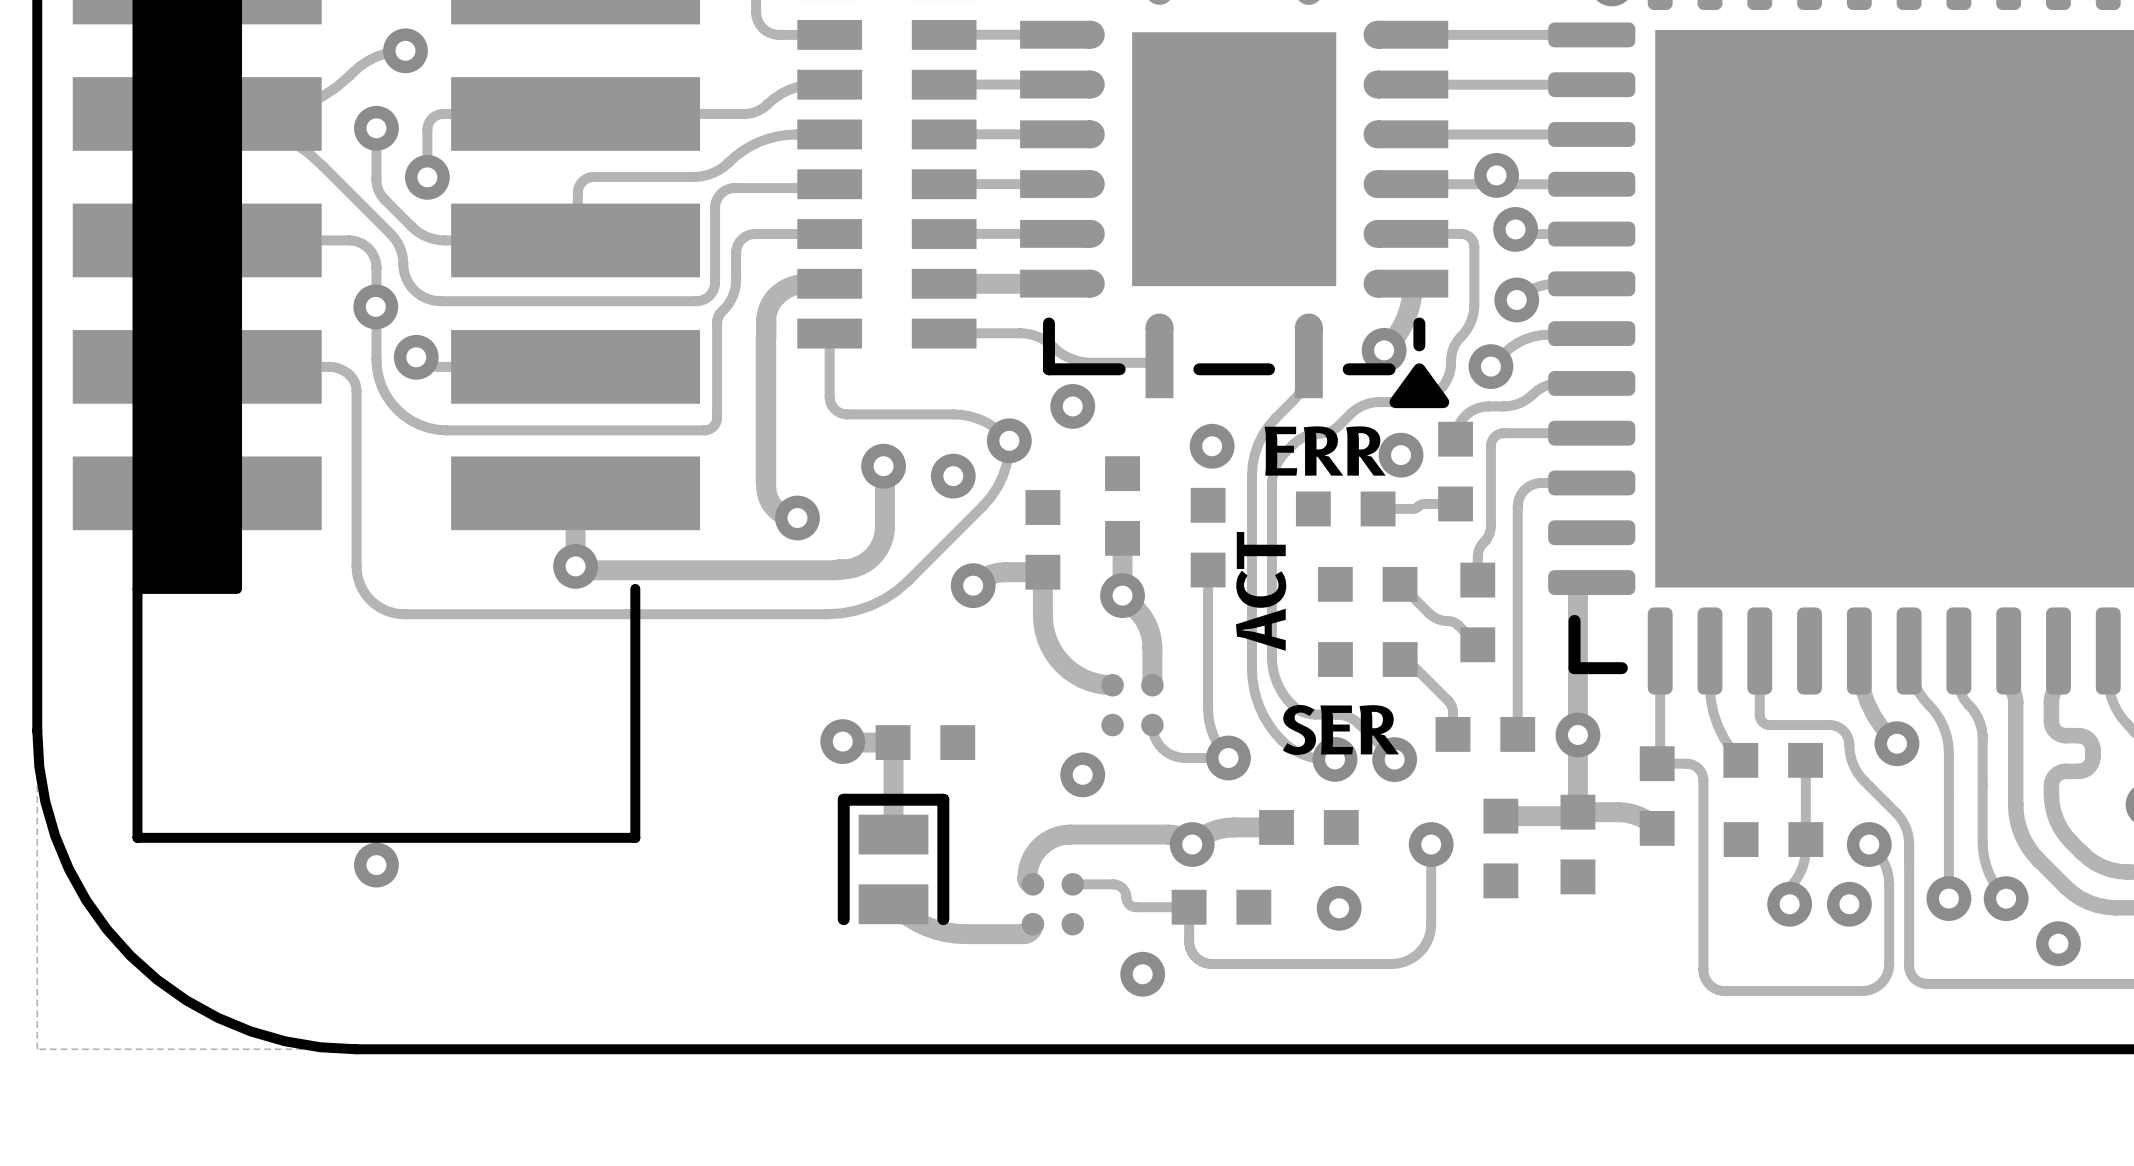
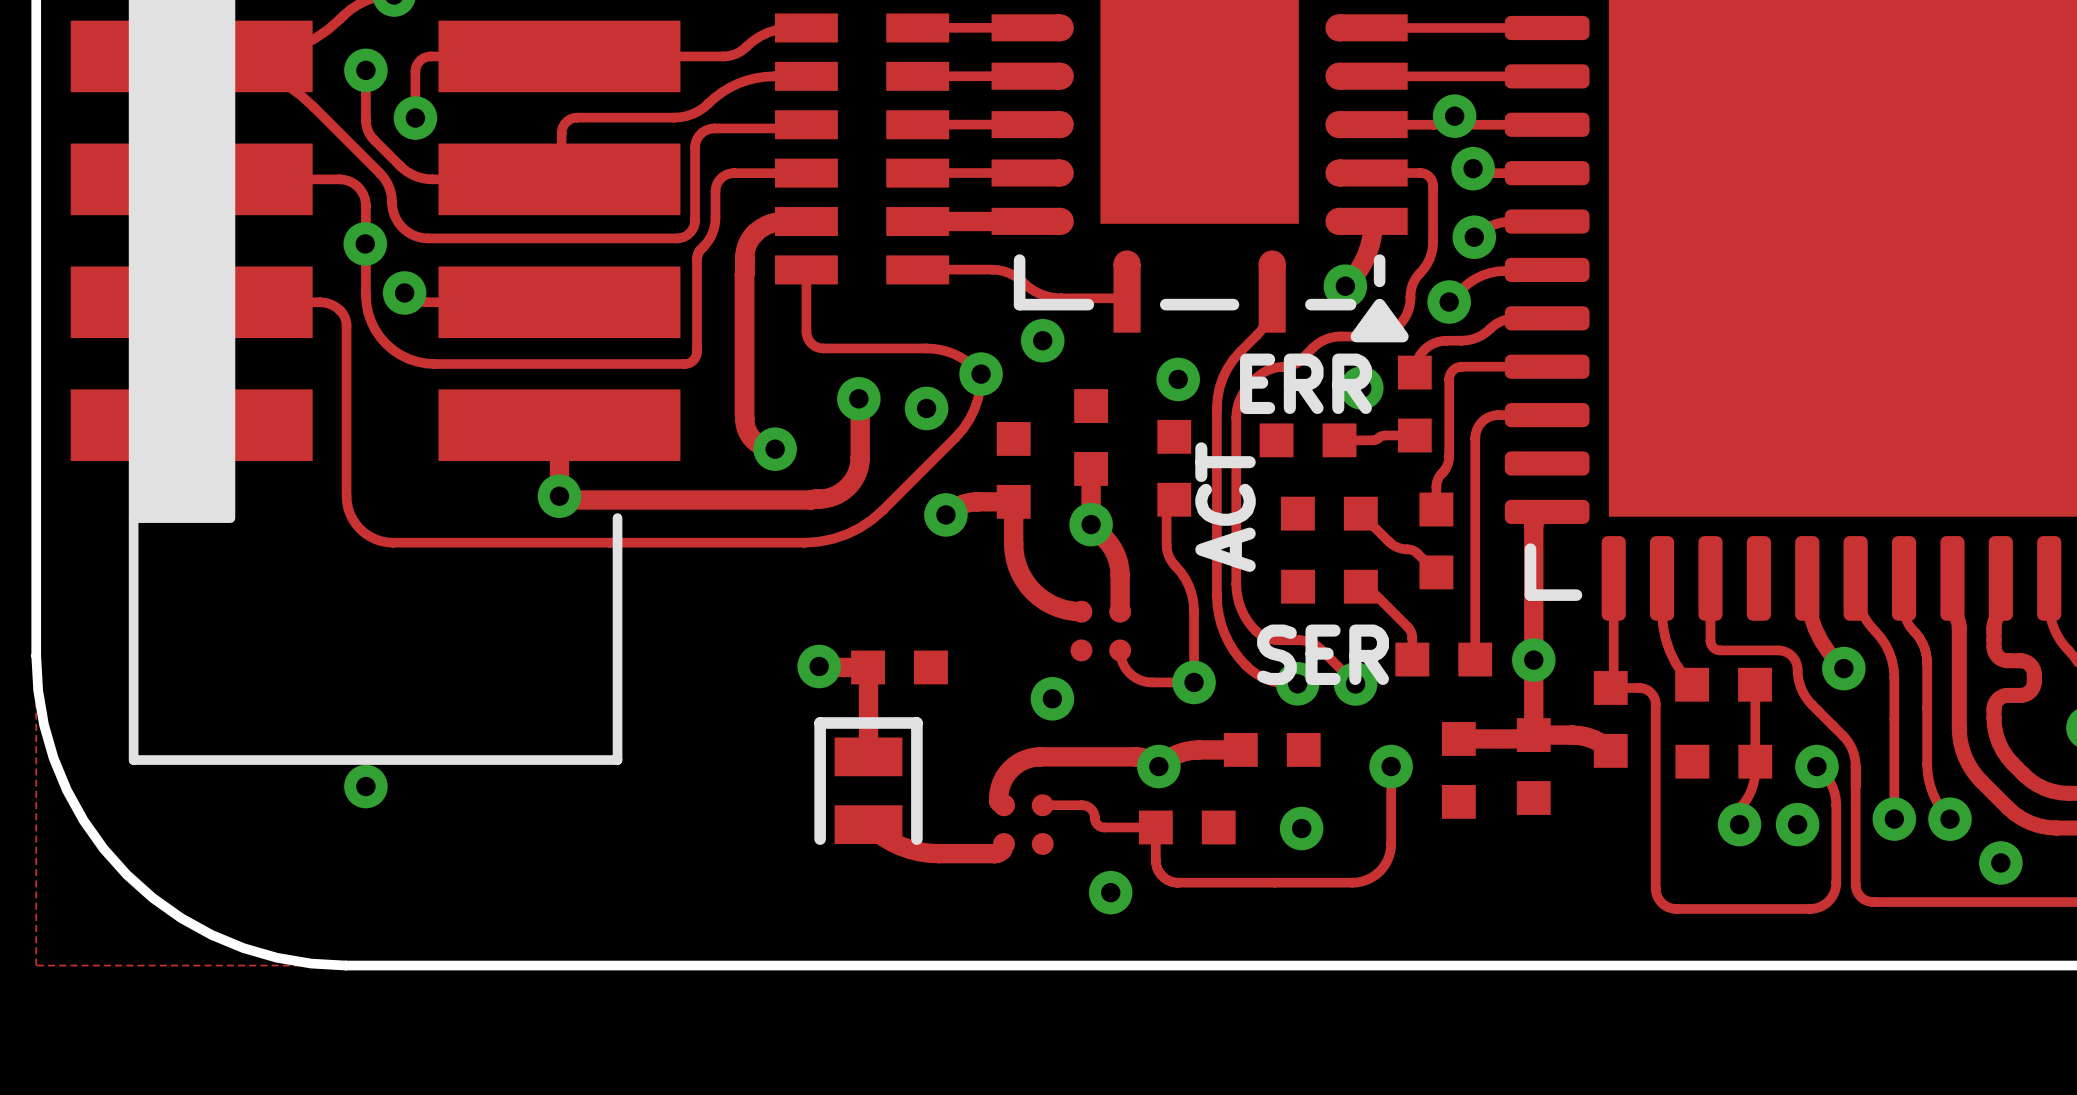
track: (1208, 570) (1208, 715) (1213, 735) (1228, 758) -> (1166, 499) (1167, 552) (1172, 562) (1185, 579) (1193, 602) (1194, 682)

